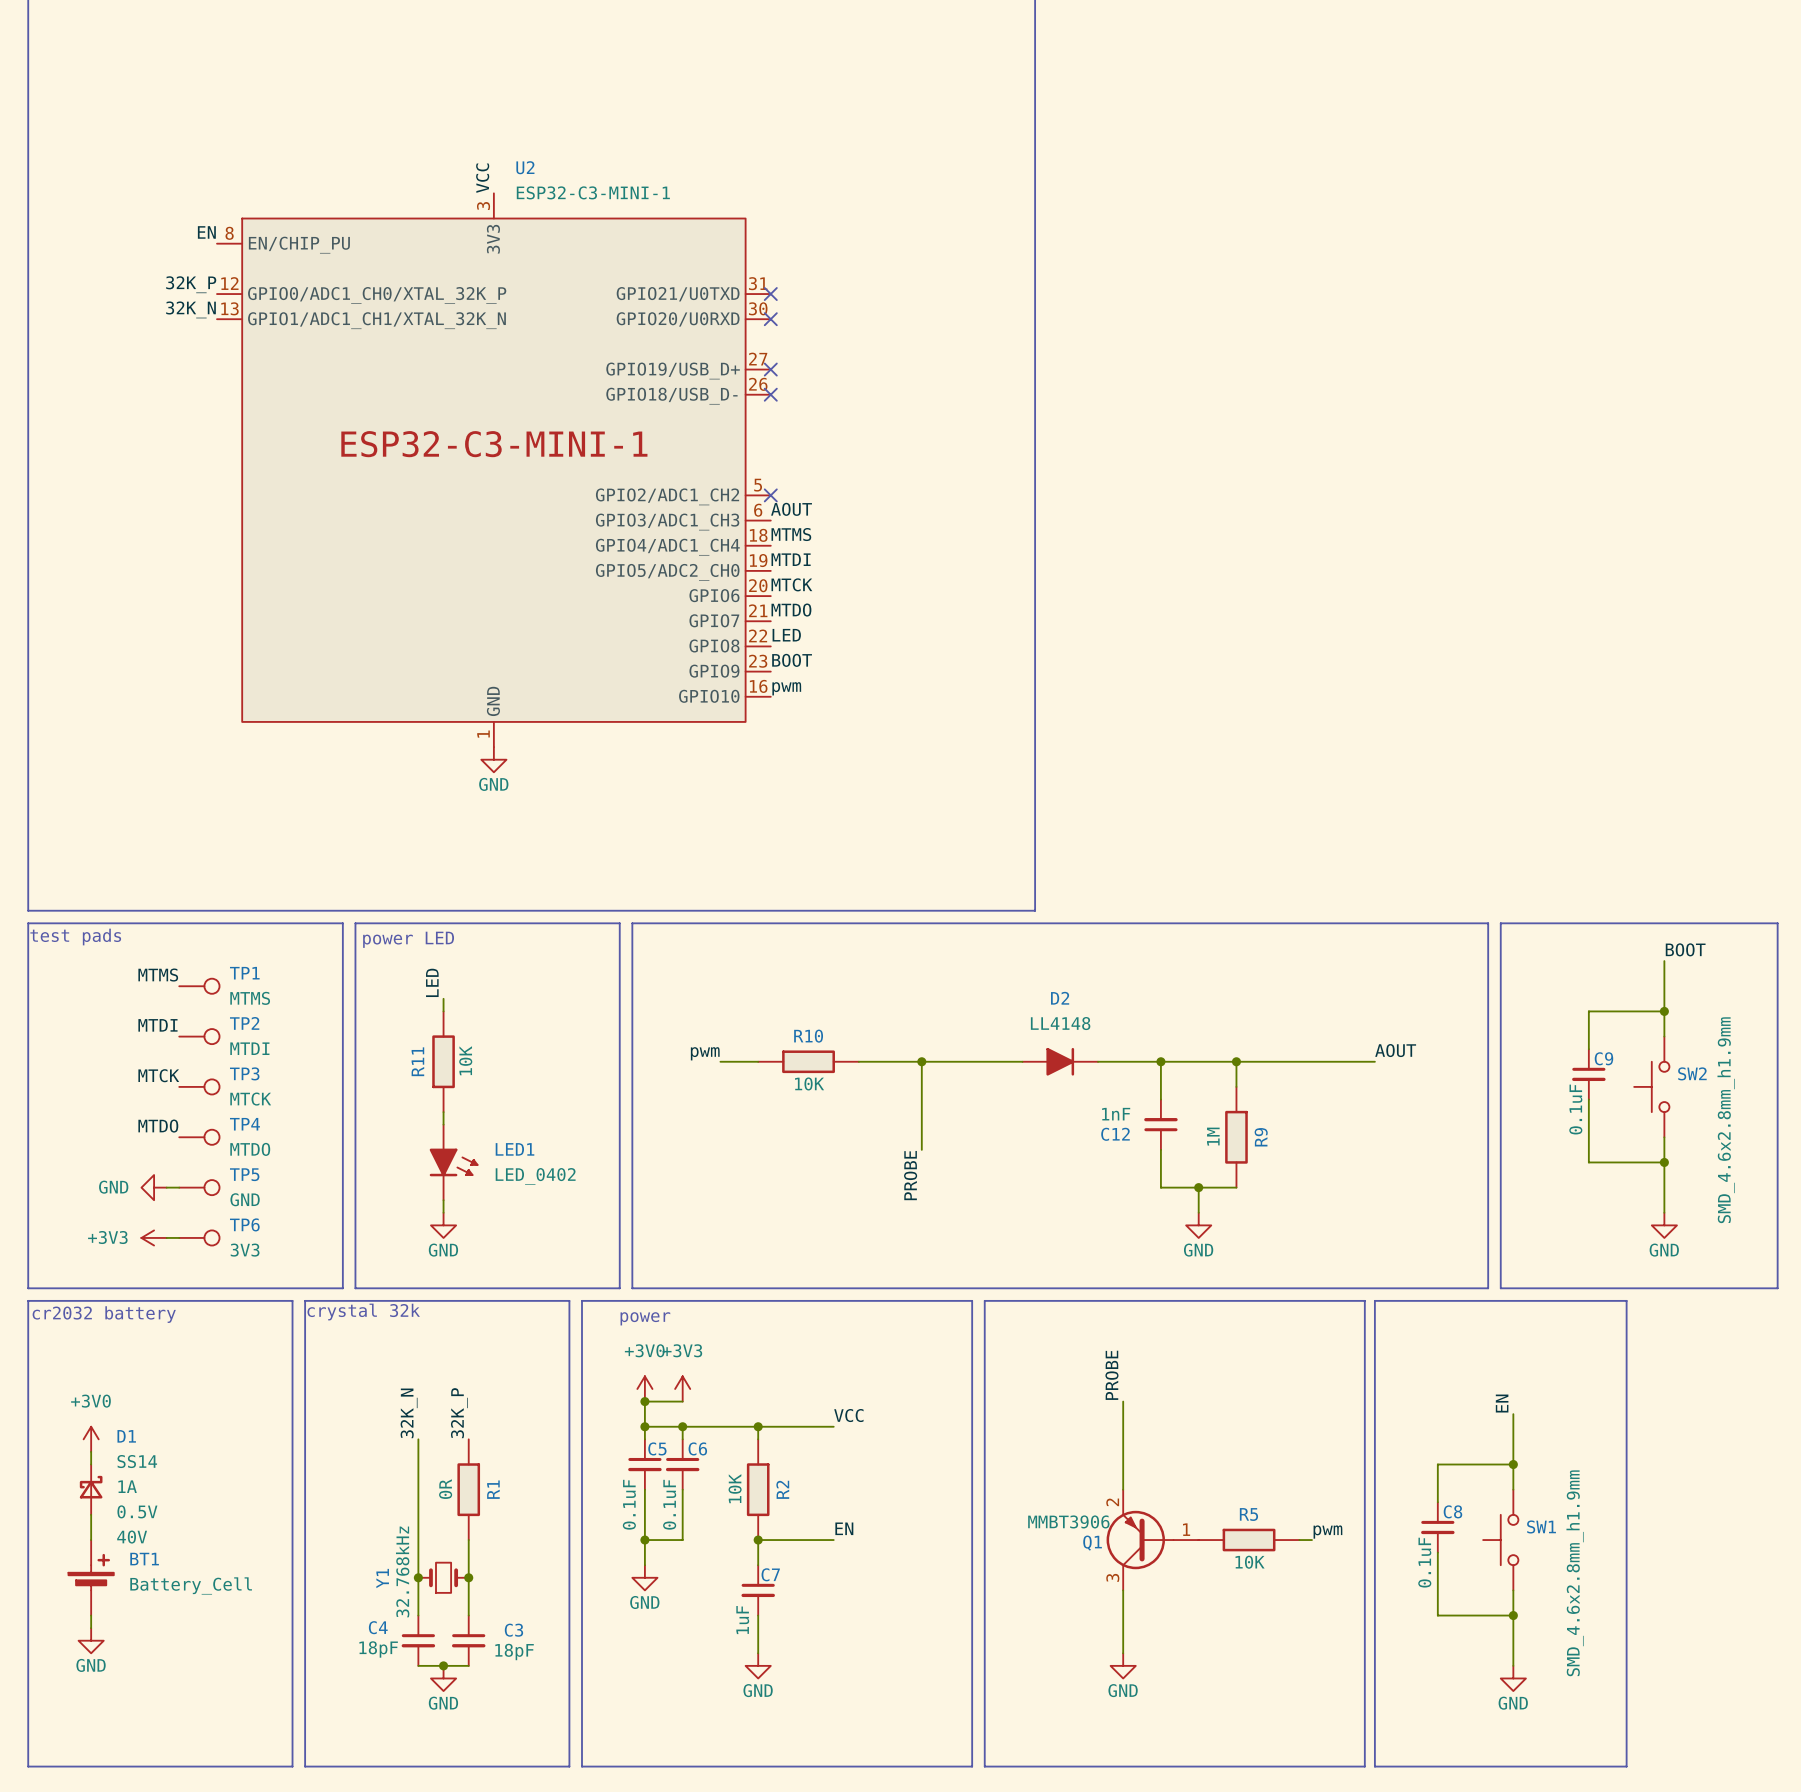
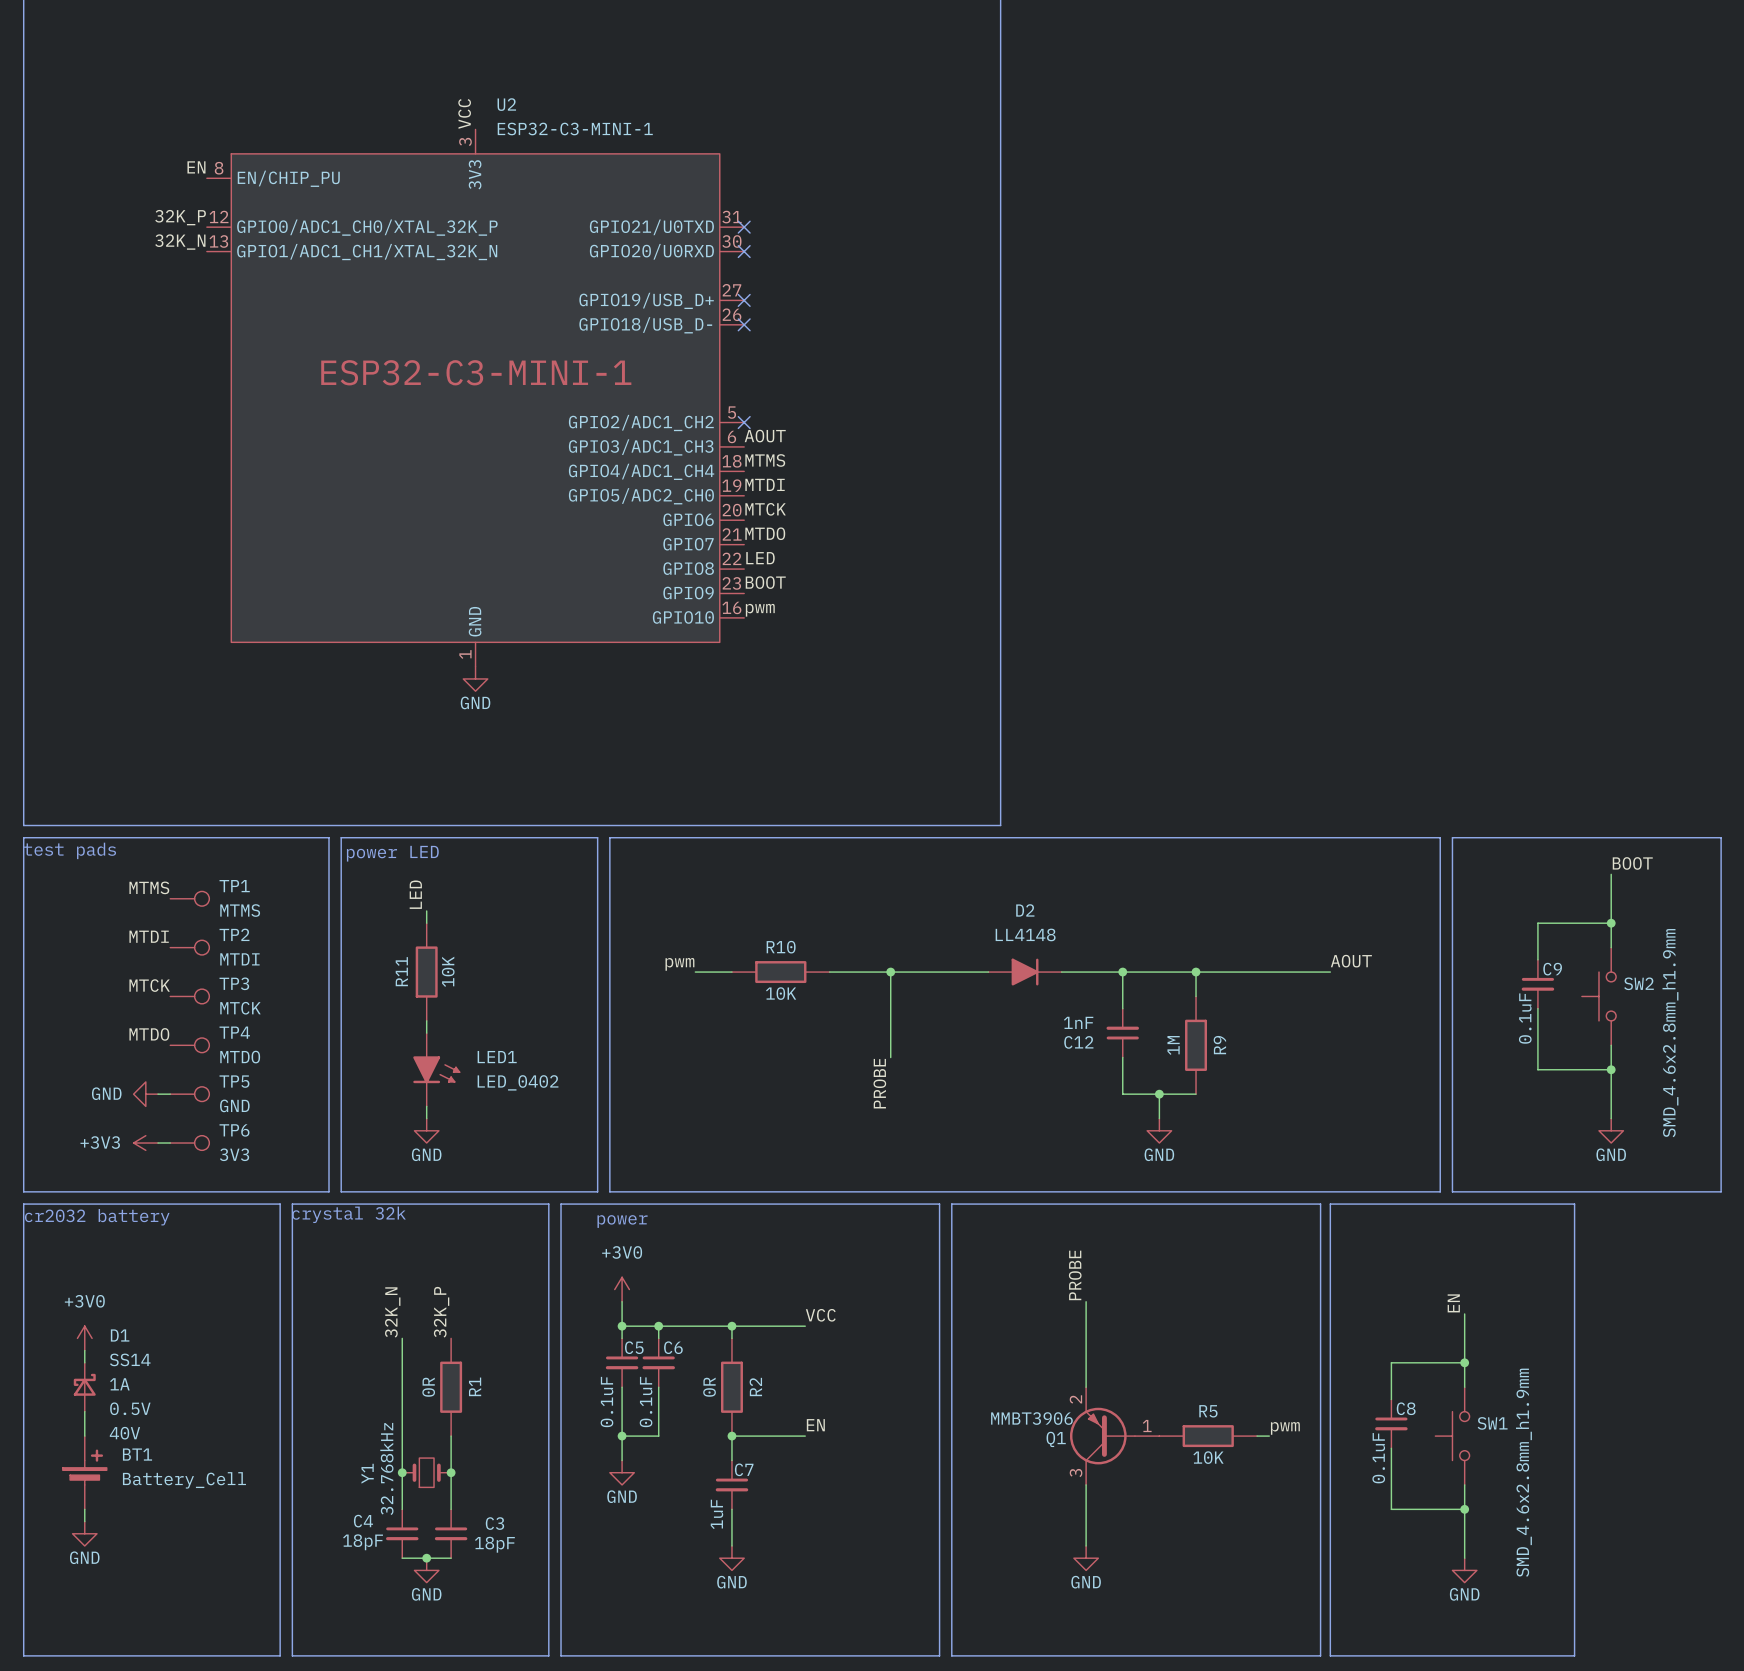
power symbol: +3V3 (682, 1388) -> none
wire: (644, 1401) (682, 1401) -> none
junction: (644, 1401) -> none
R2 value: 10K (735, 1488) -> 0R (709, 1387)

